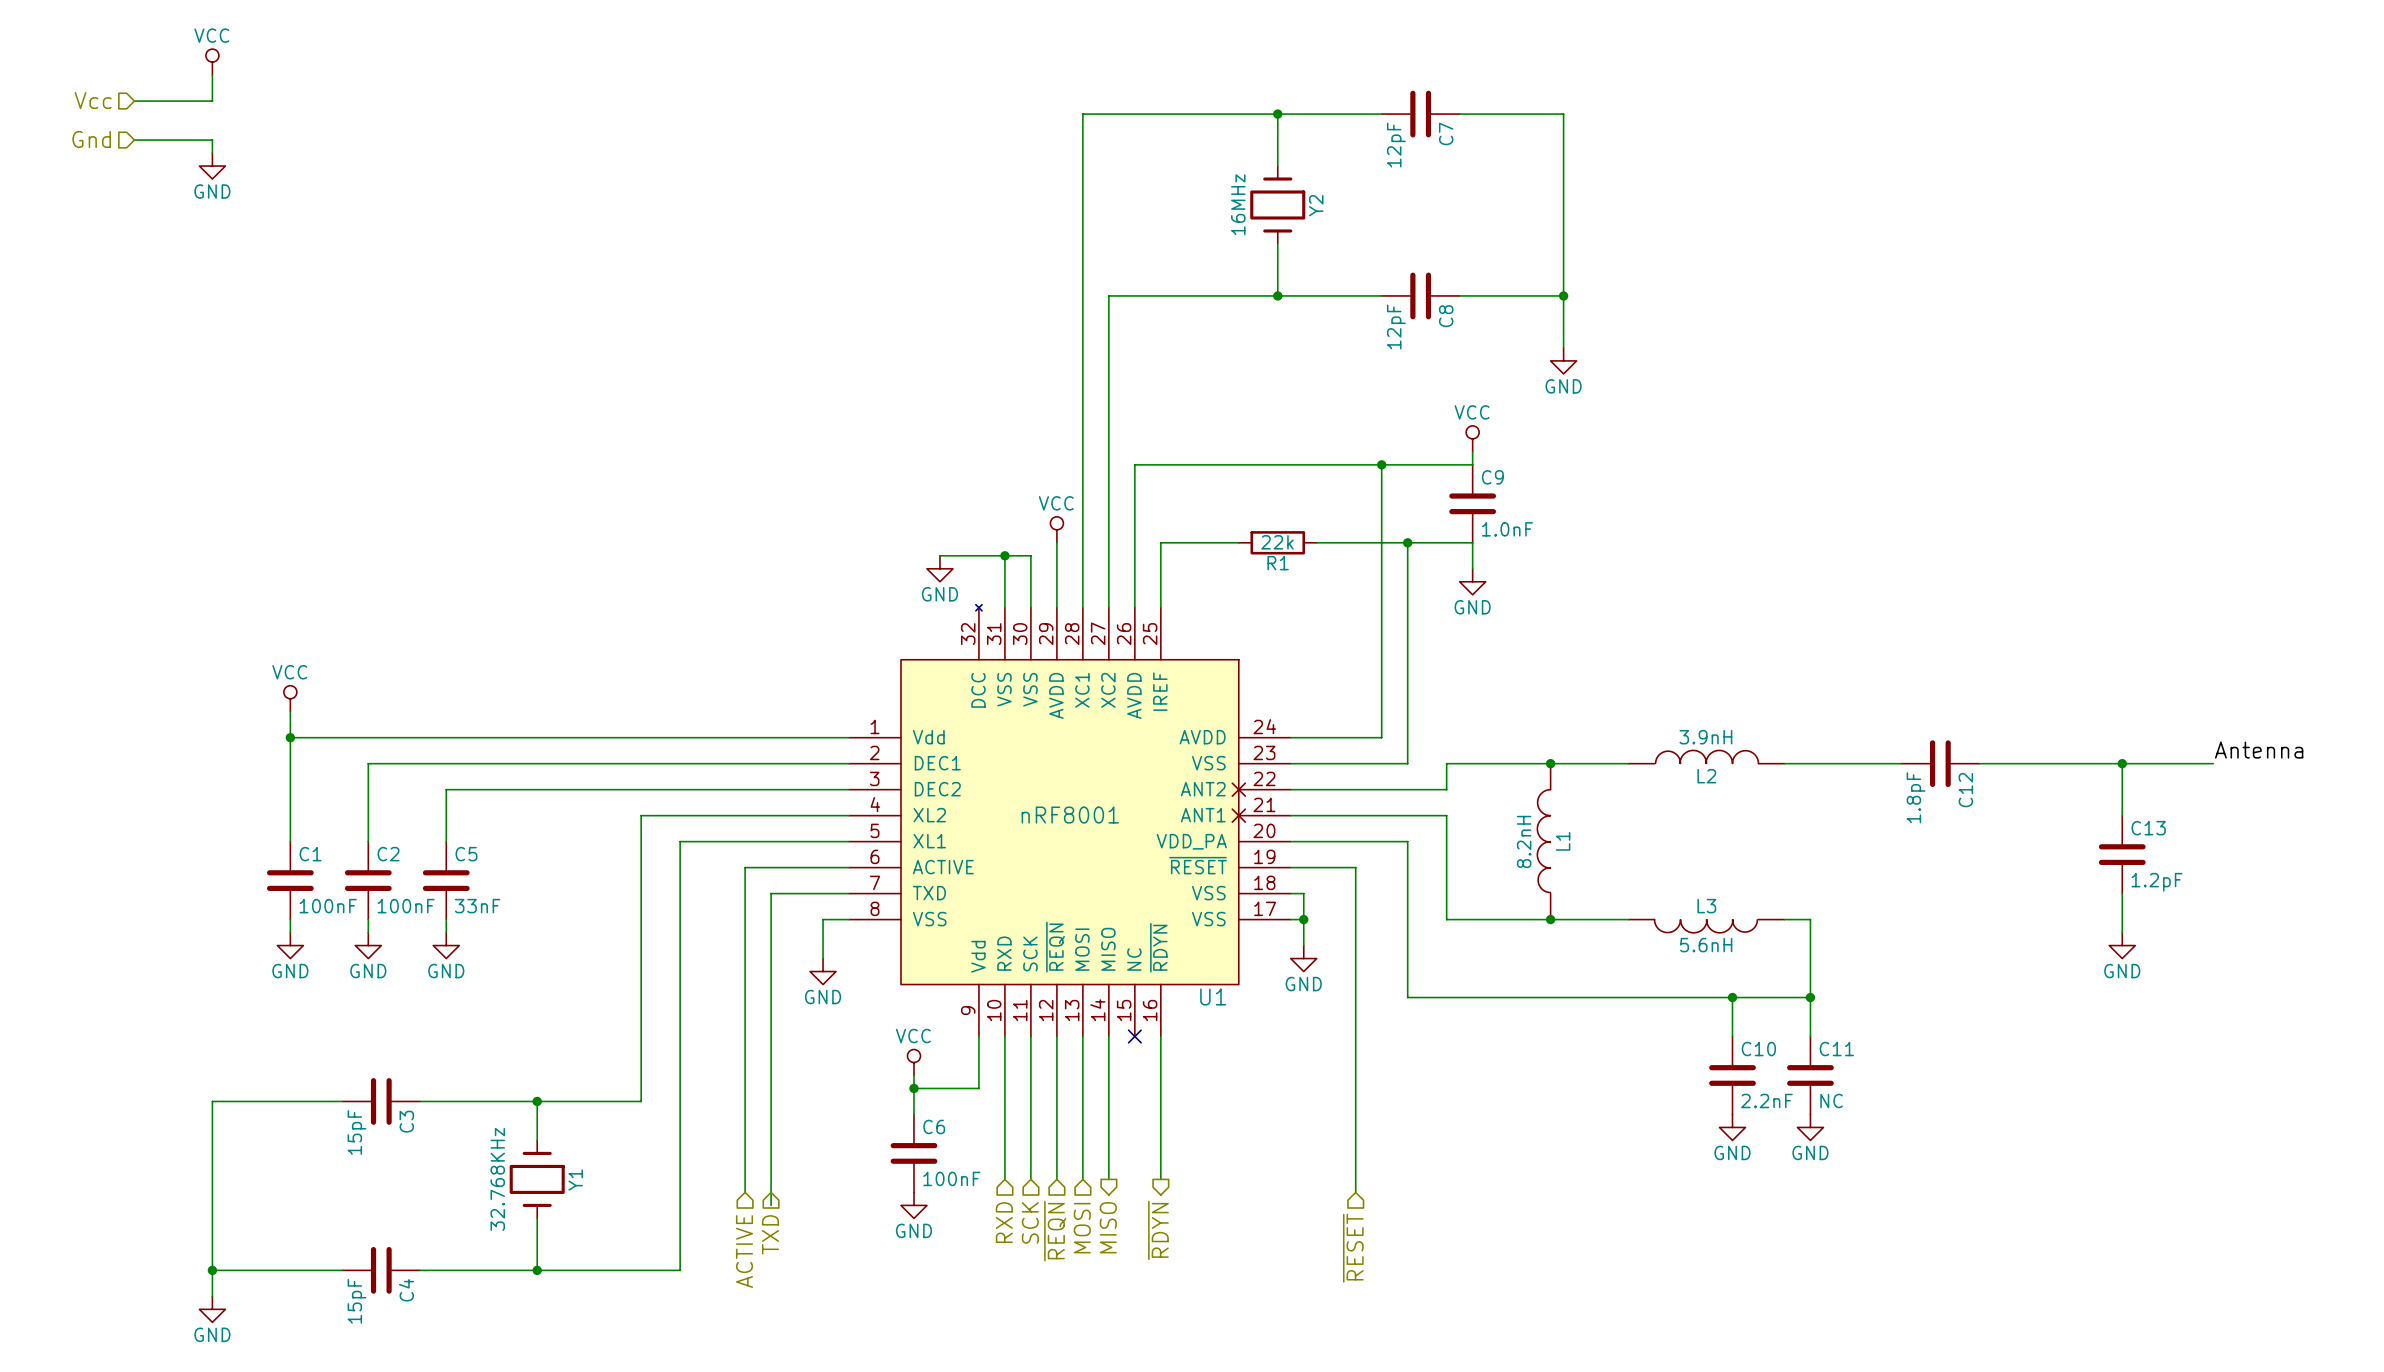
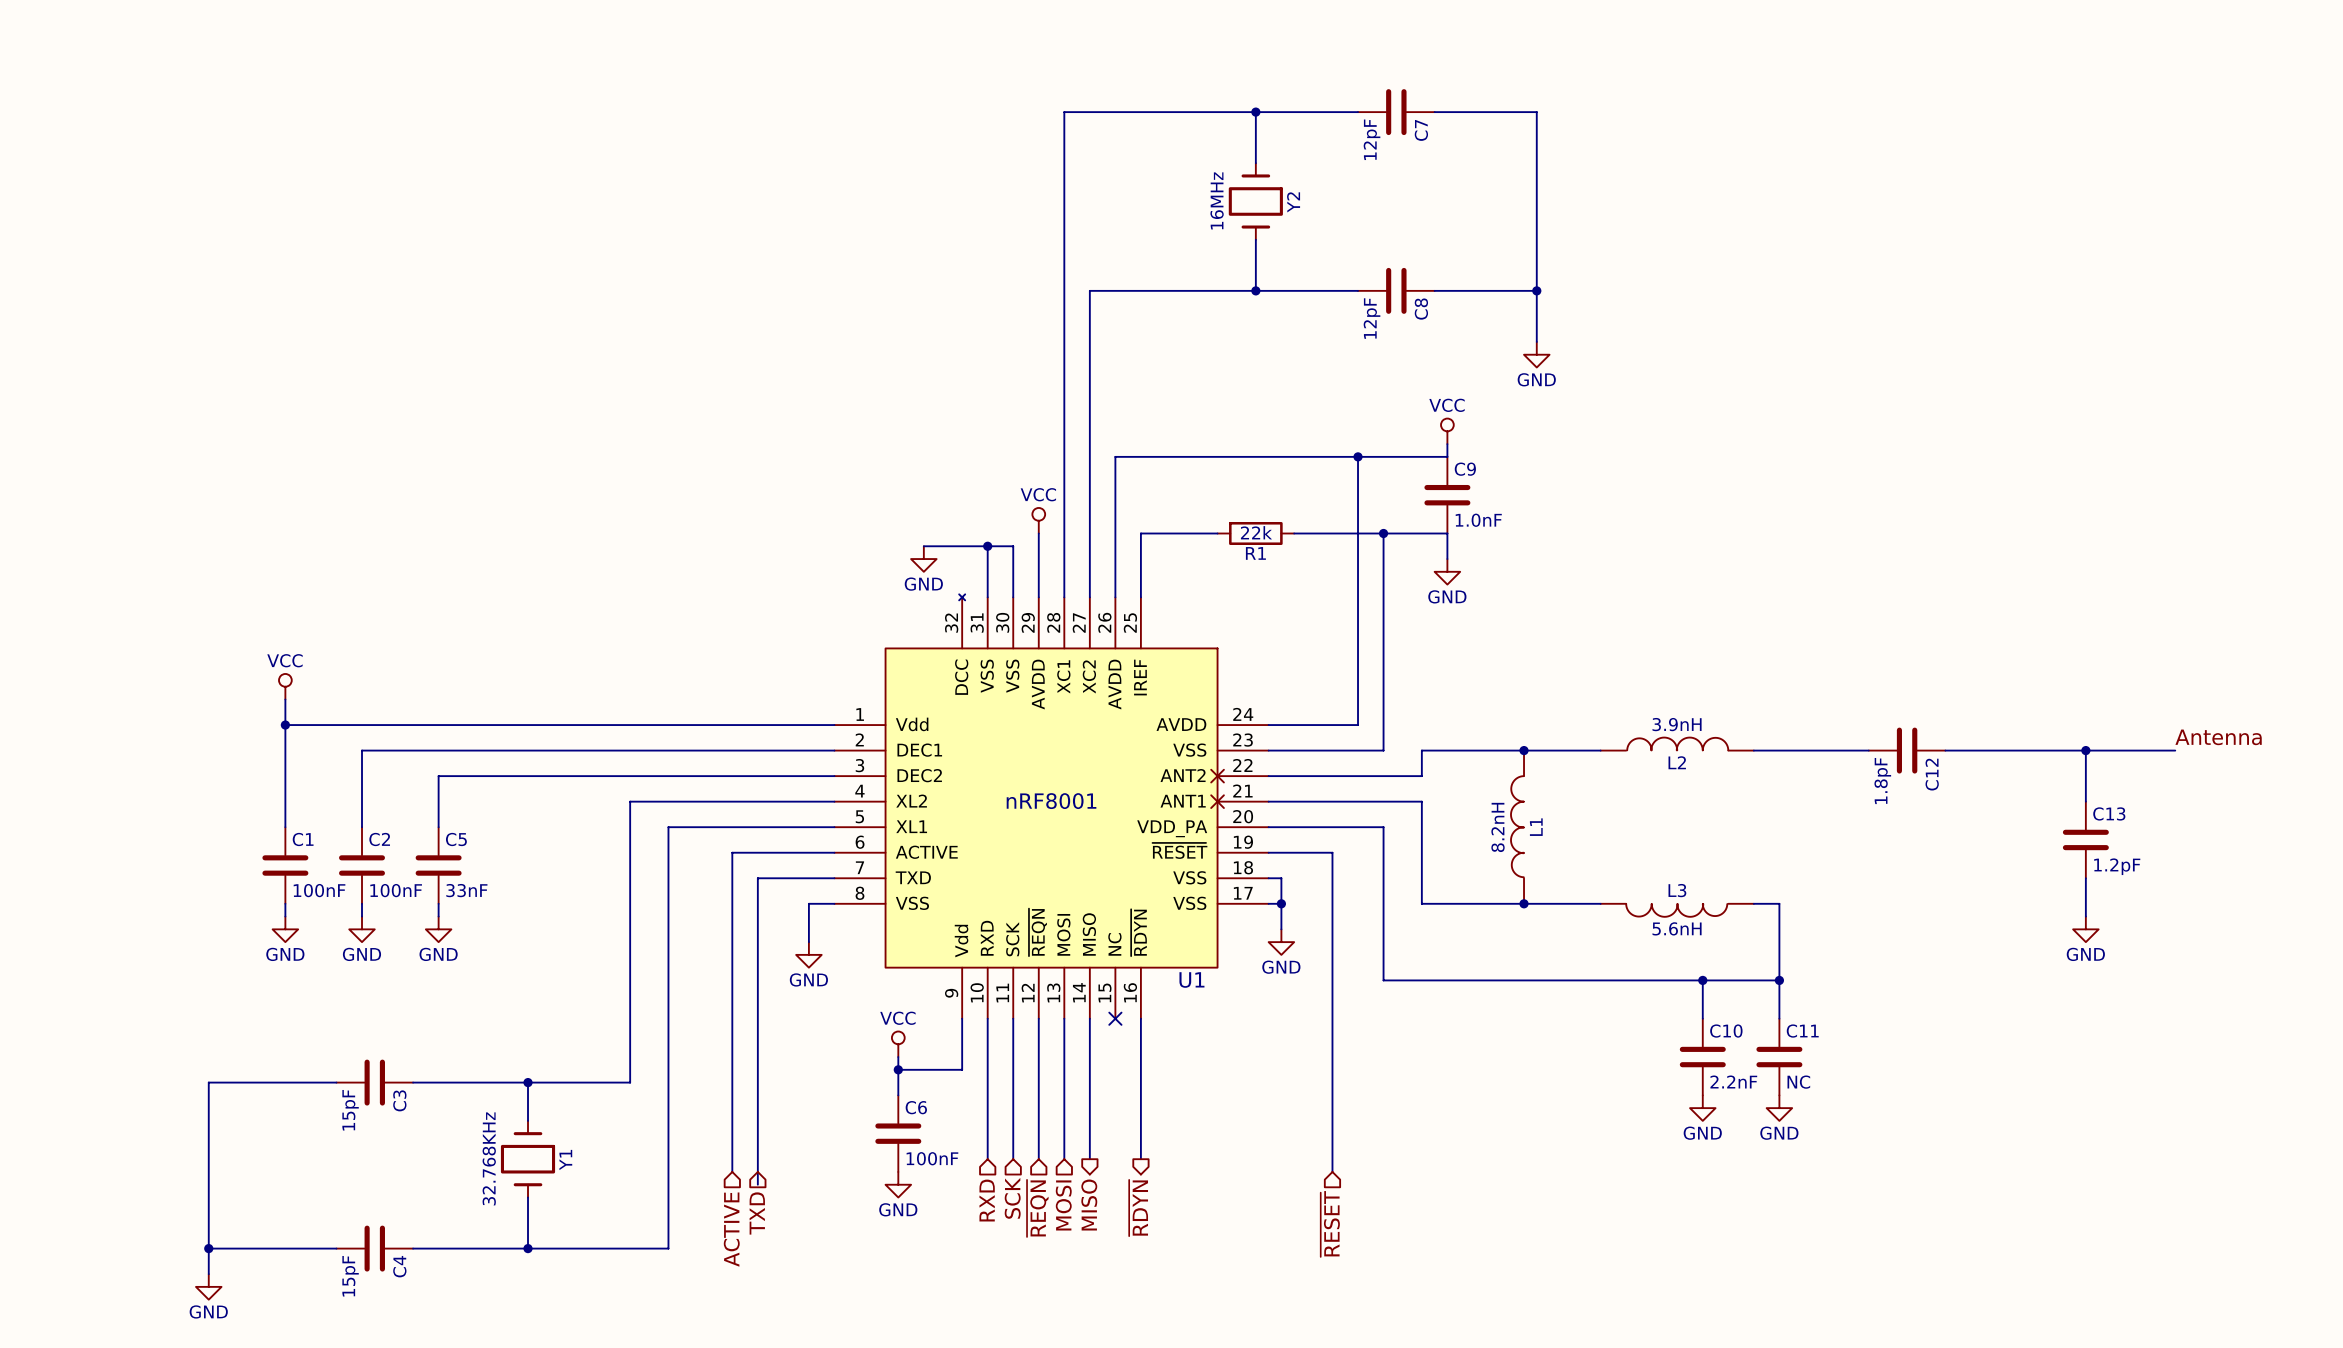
power symbol: VCC (212, 62) -> none
wire: (212, 75) (212, 101) (134, 101) -> none
hierarchical label: Vcc (93, 100) -> none
hierarchical label: Gnd (91, 139) -> none
wire: (134, 140) (212, 140) (212, 153) -> none
power symbol: GND (212, 166) -> none

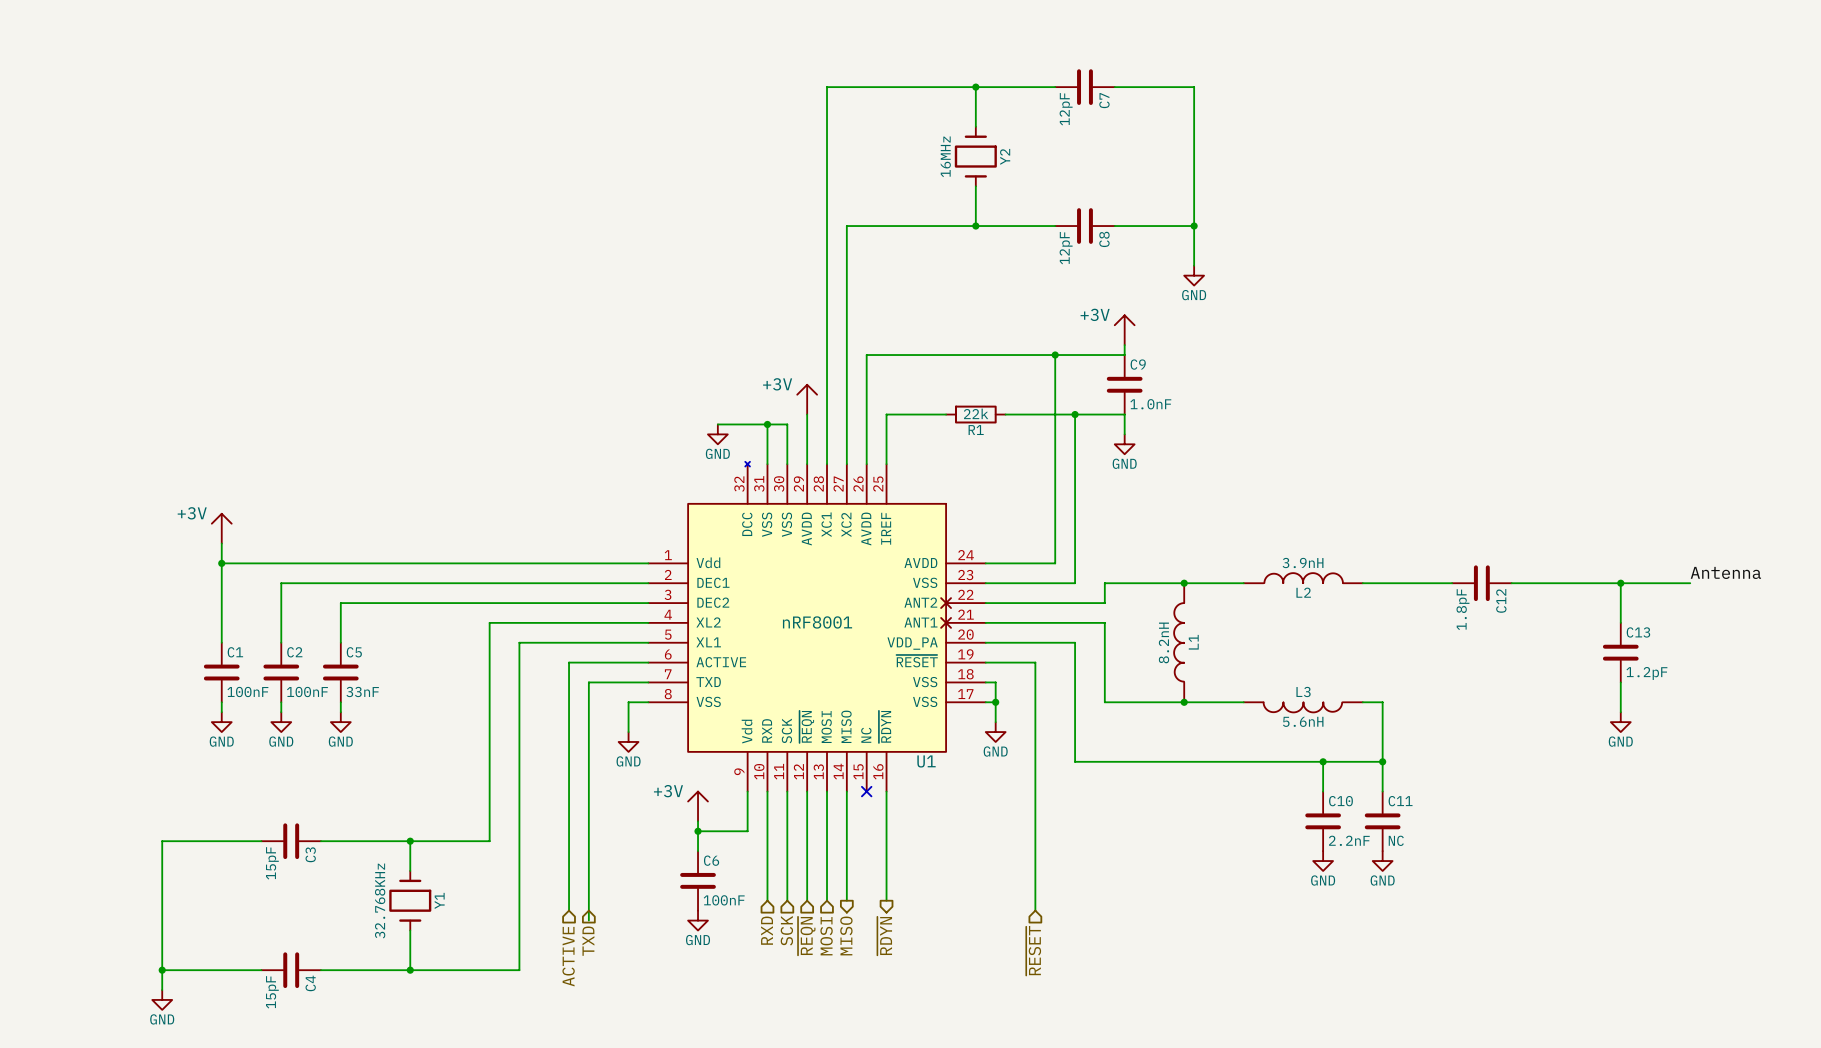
power symbol: VCC (1447, 431) -> +3V (1124, 330)
power symbol: VCC (1038, 520) -> +3V (807, 399)
power symbol: VCC (285, 686) -> +3V (221, 528)
power symbol: VCC (898, 1044) -> +3V (698, 806)

